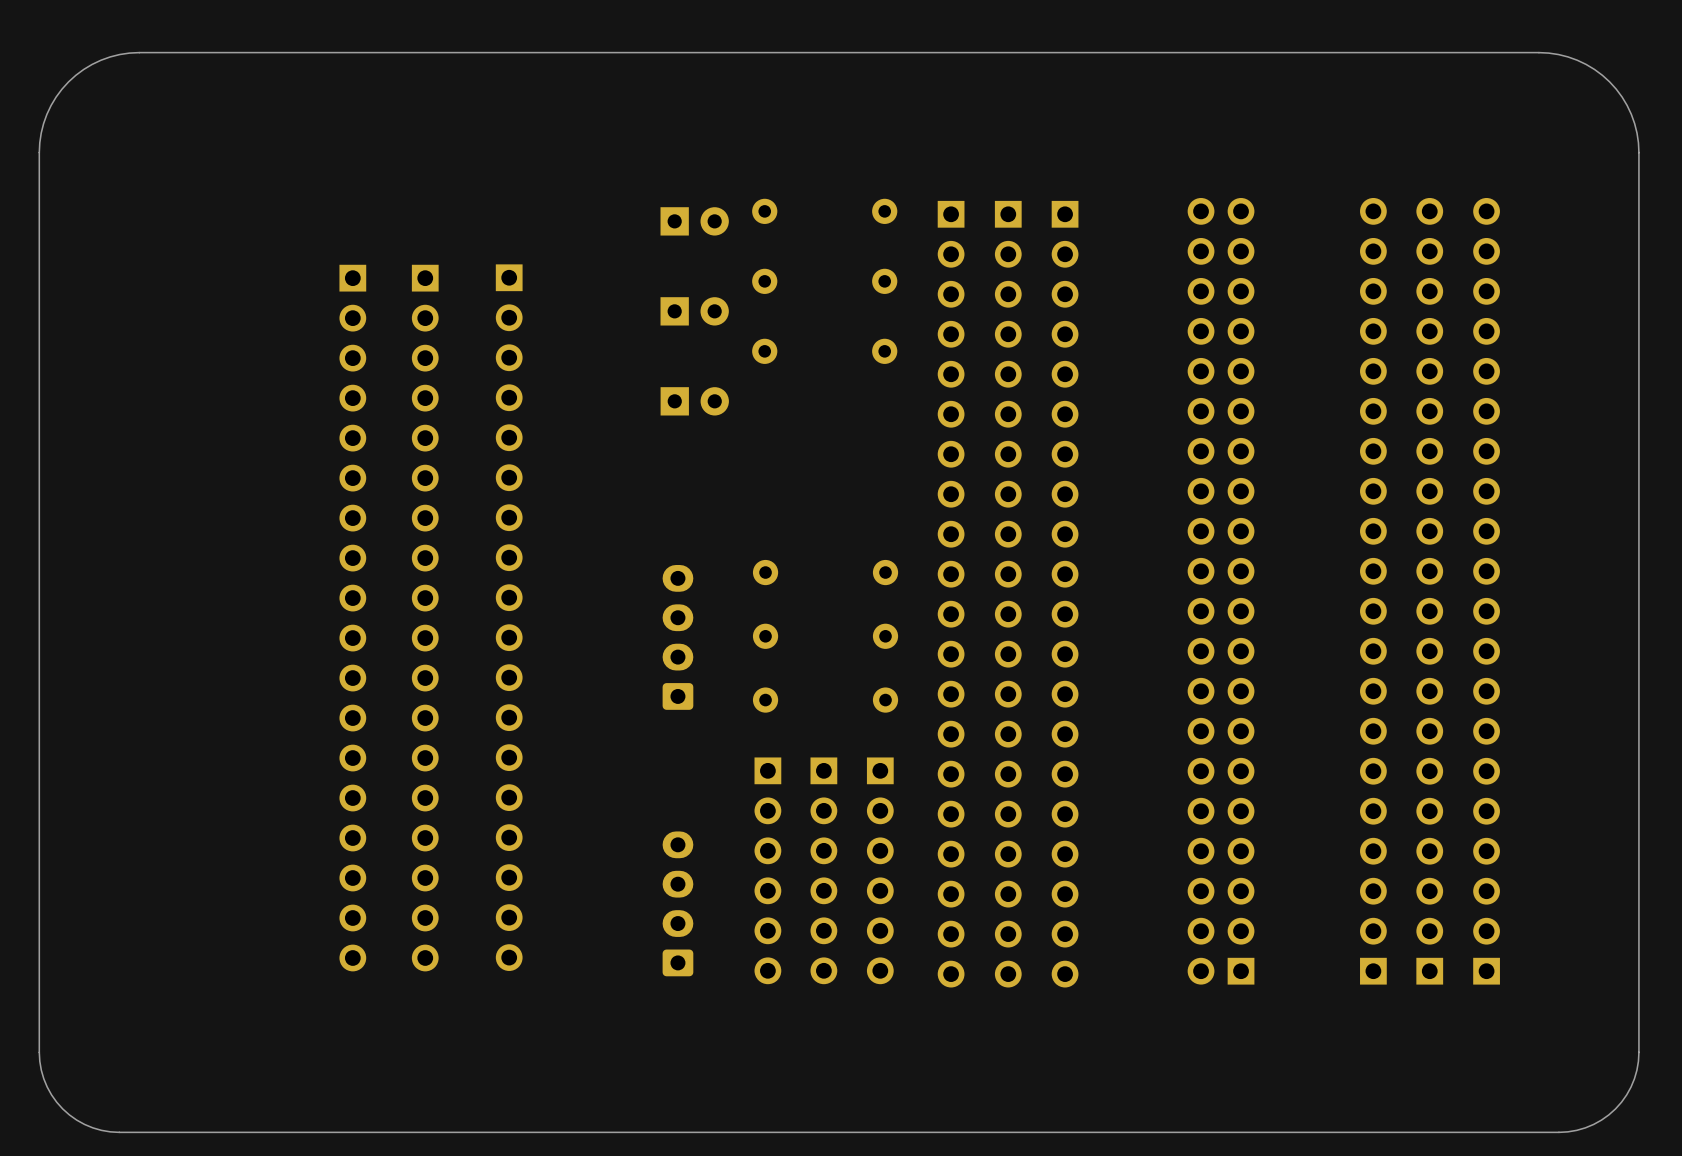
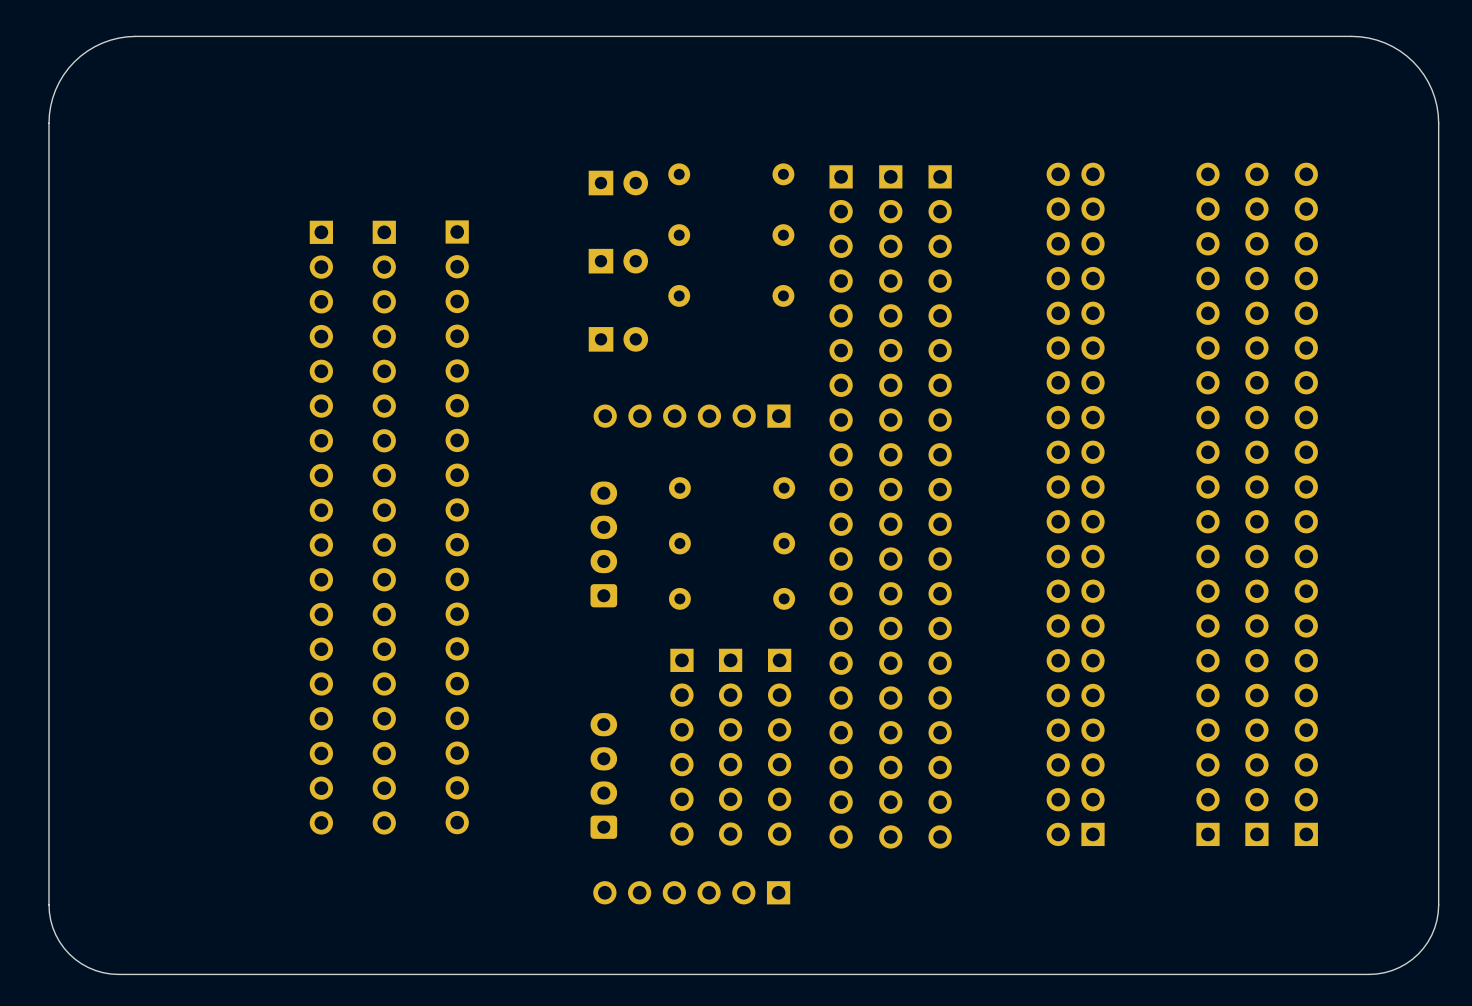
part: none -> (692, 416)
part: none -> (691, 892)

